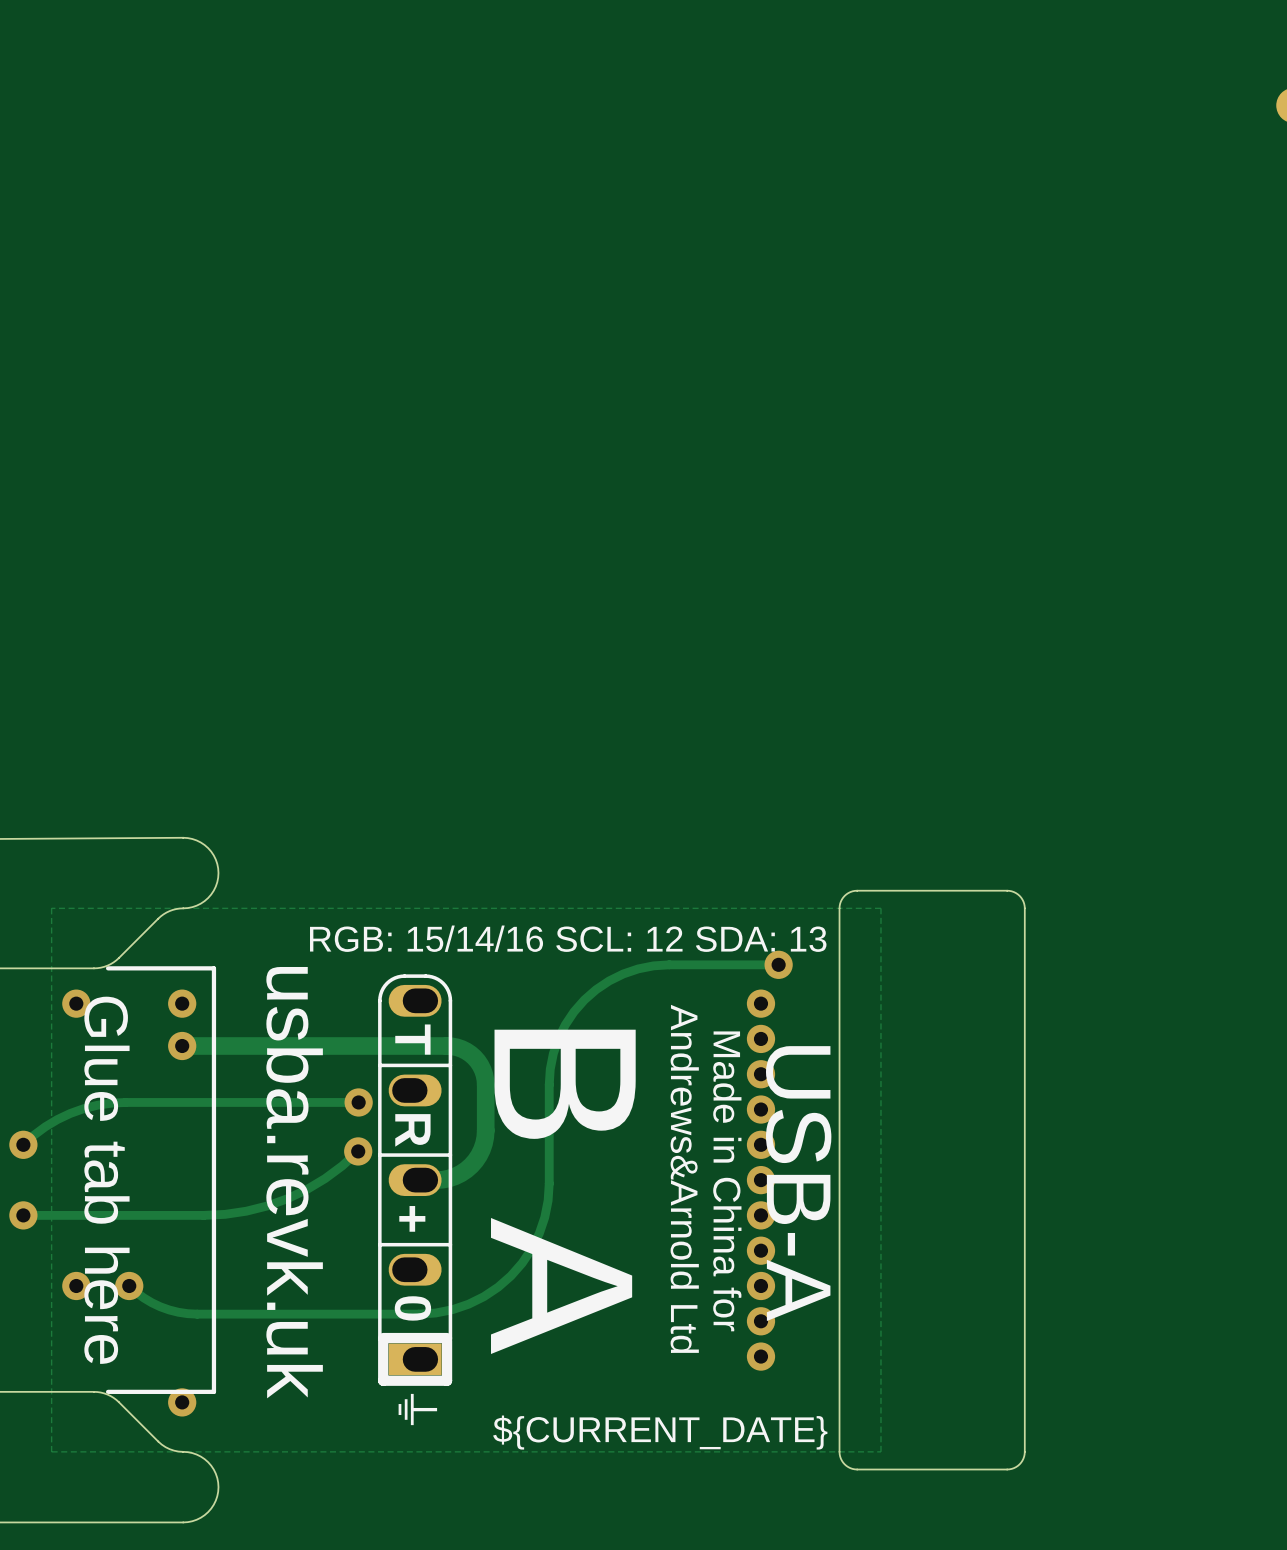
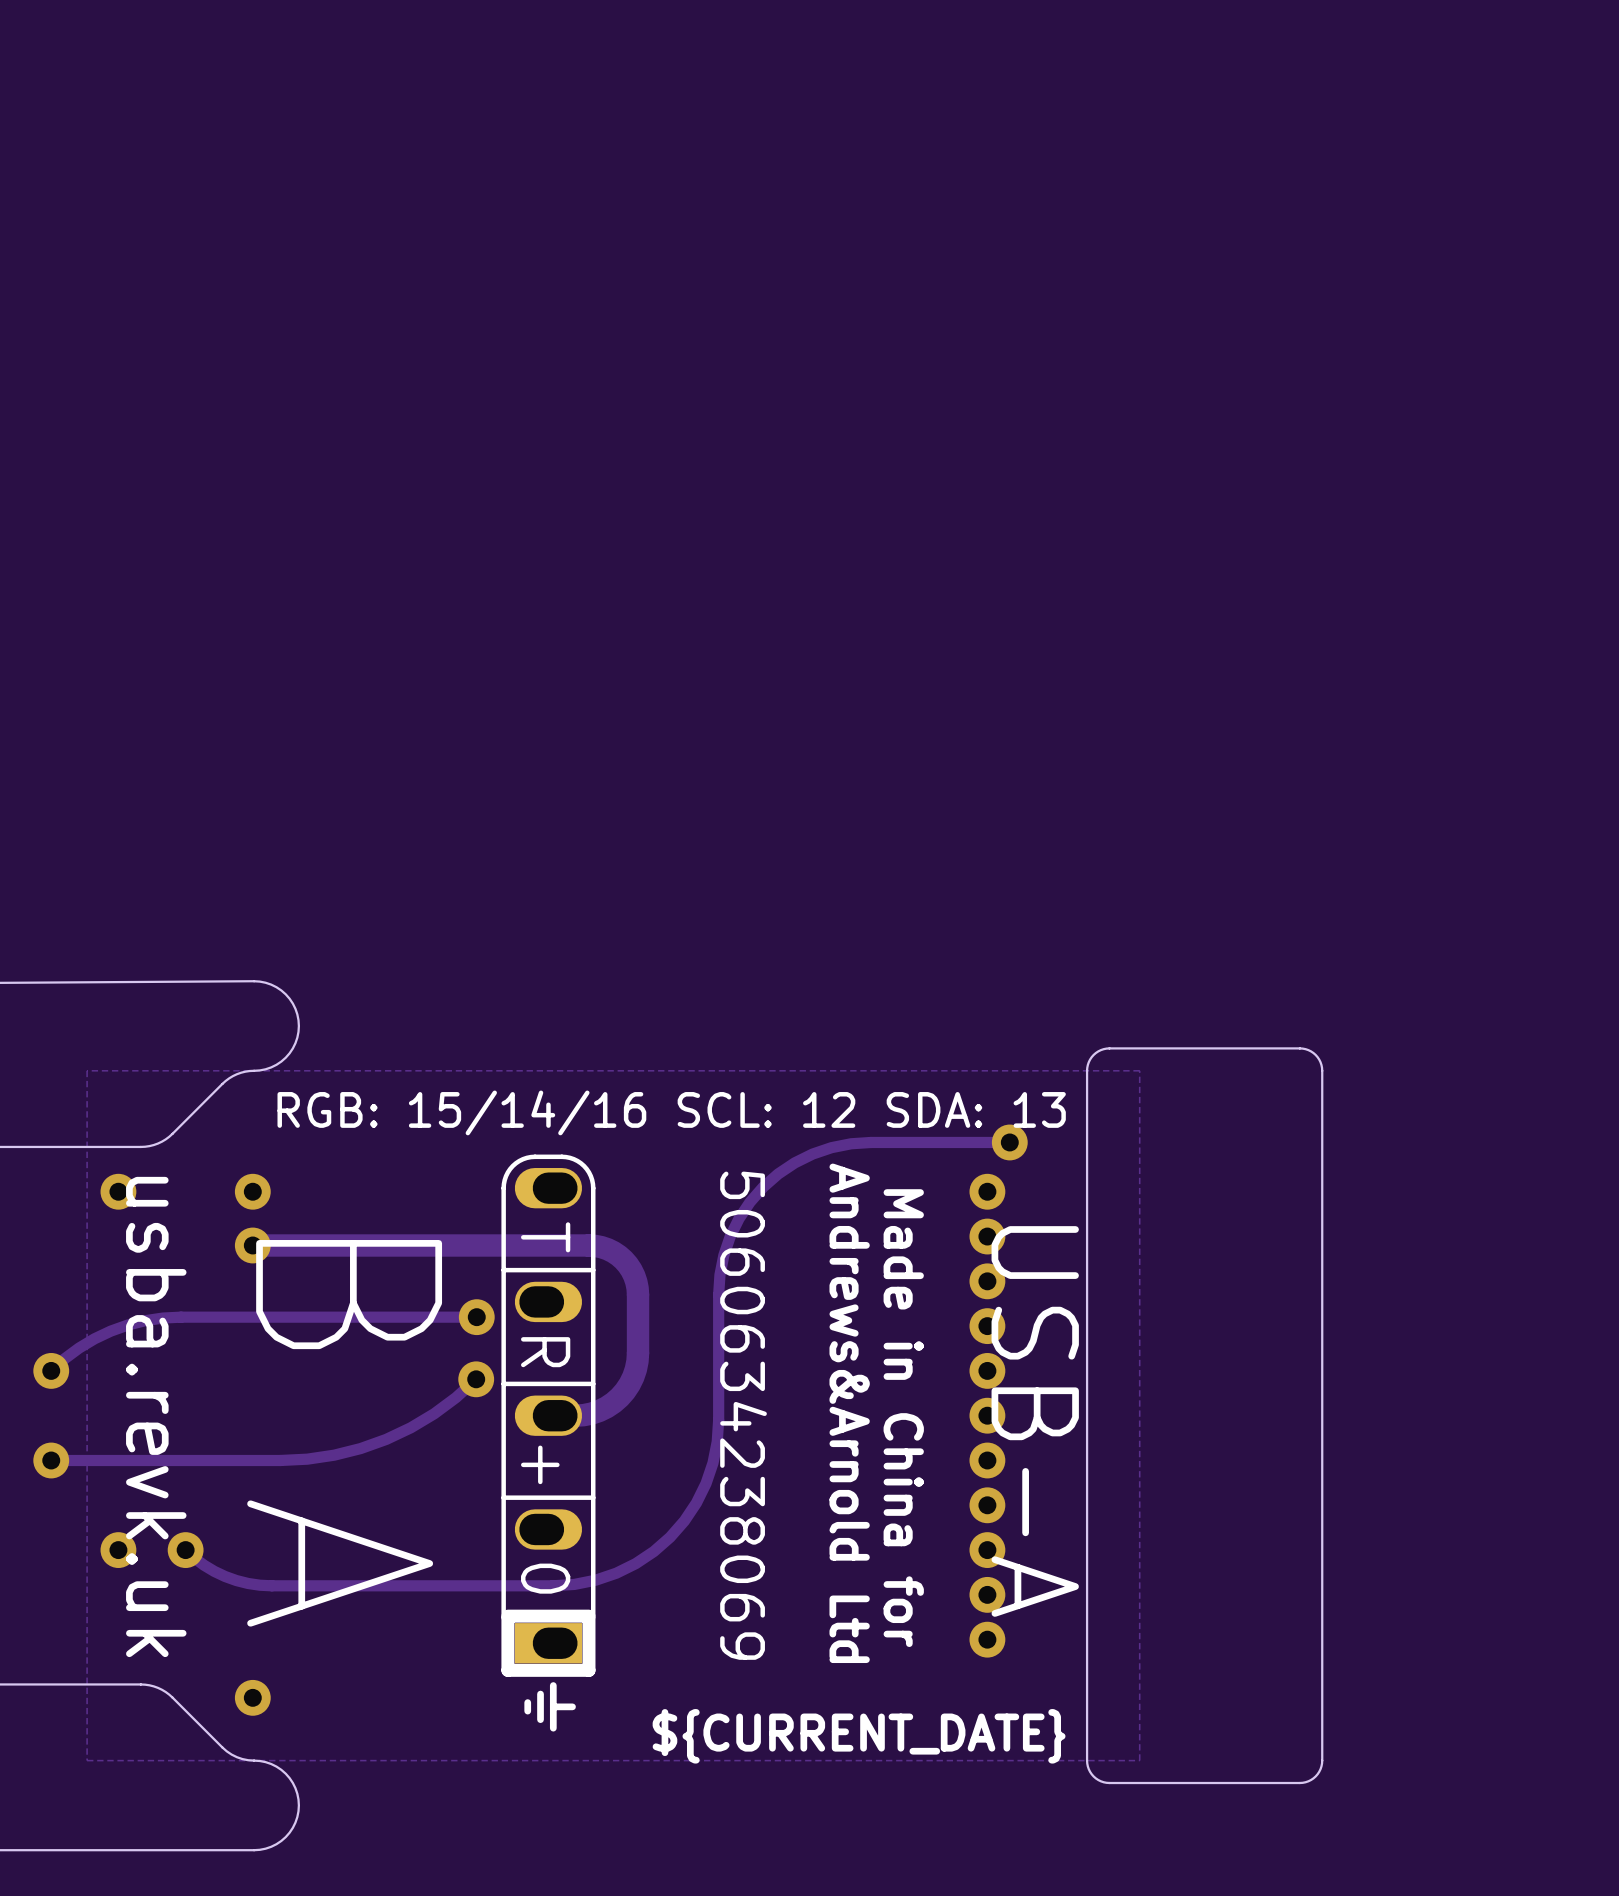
line: (108, 968) (213, 968) (213, 1391) (108, 1391) -> none
text position: B (565, 1084) -> B (349, 1294)
text position: Andrews&Arnold Ltd (684, 1178) -> Andrews&Arnold Ltd (849, 1413)
text: none -> 5060634238069 (743, 1415)
text: Glue tab here (106, 1180) -> usba.revk.uk (156, 1416)
text position: Made in China for (727, 1181) -> Made in China for (903, 1418)
text: usba.revk.uk (294, 1182) -> none
text position: A (561, 1285) -> A (340, 1563)

